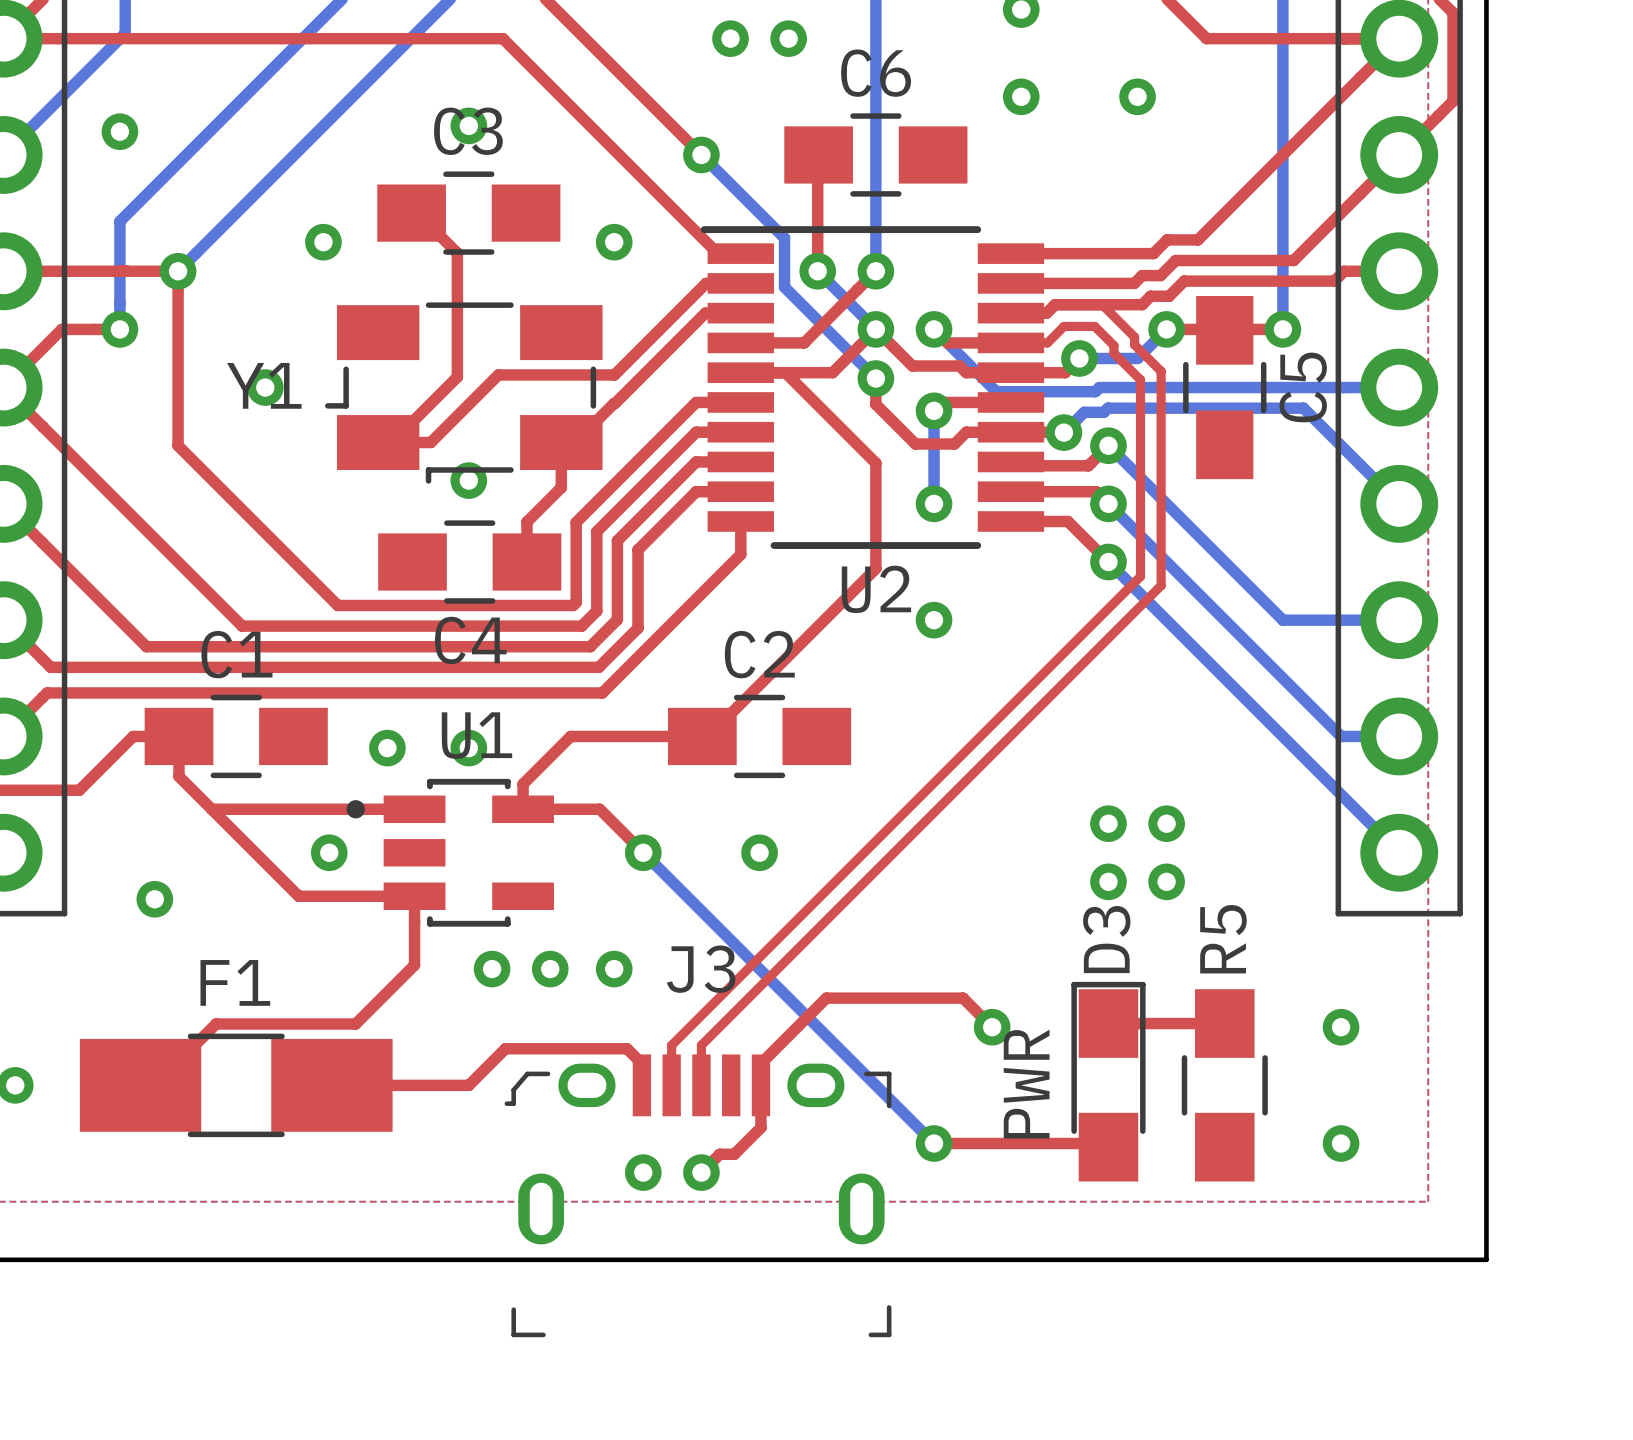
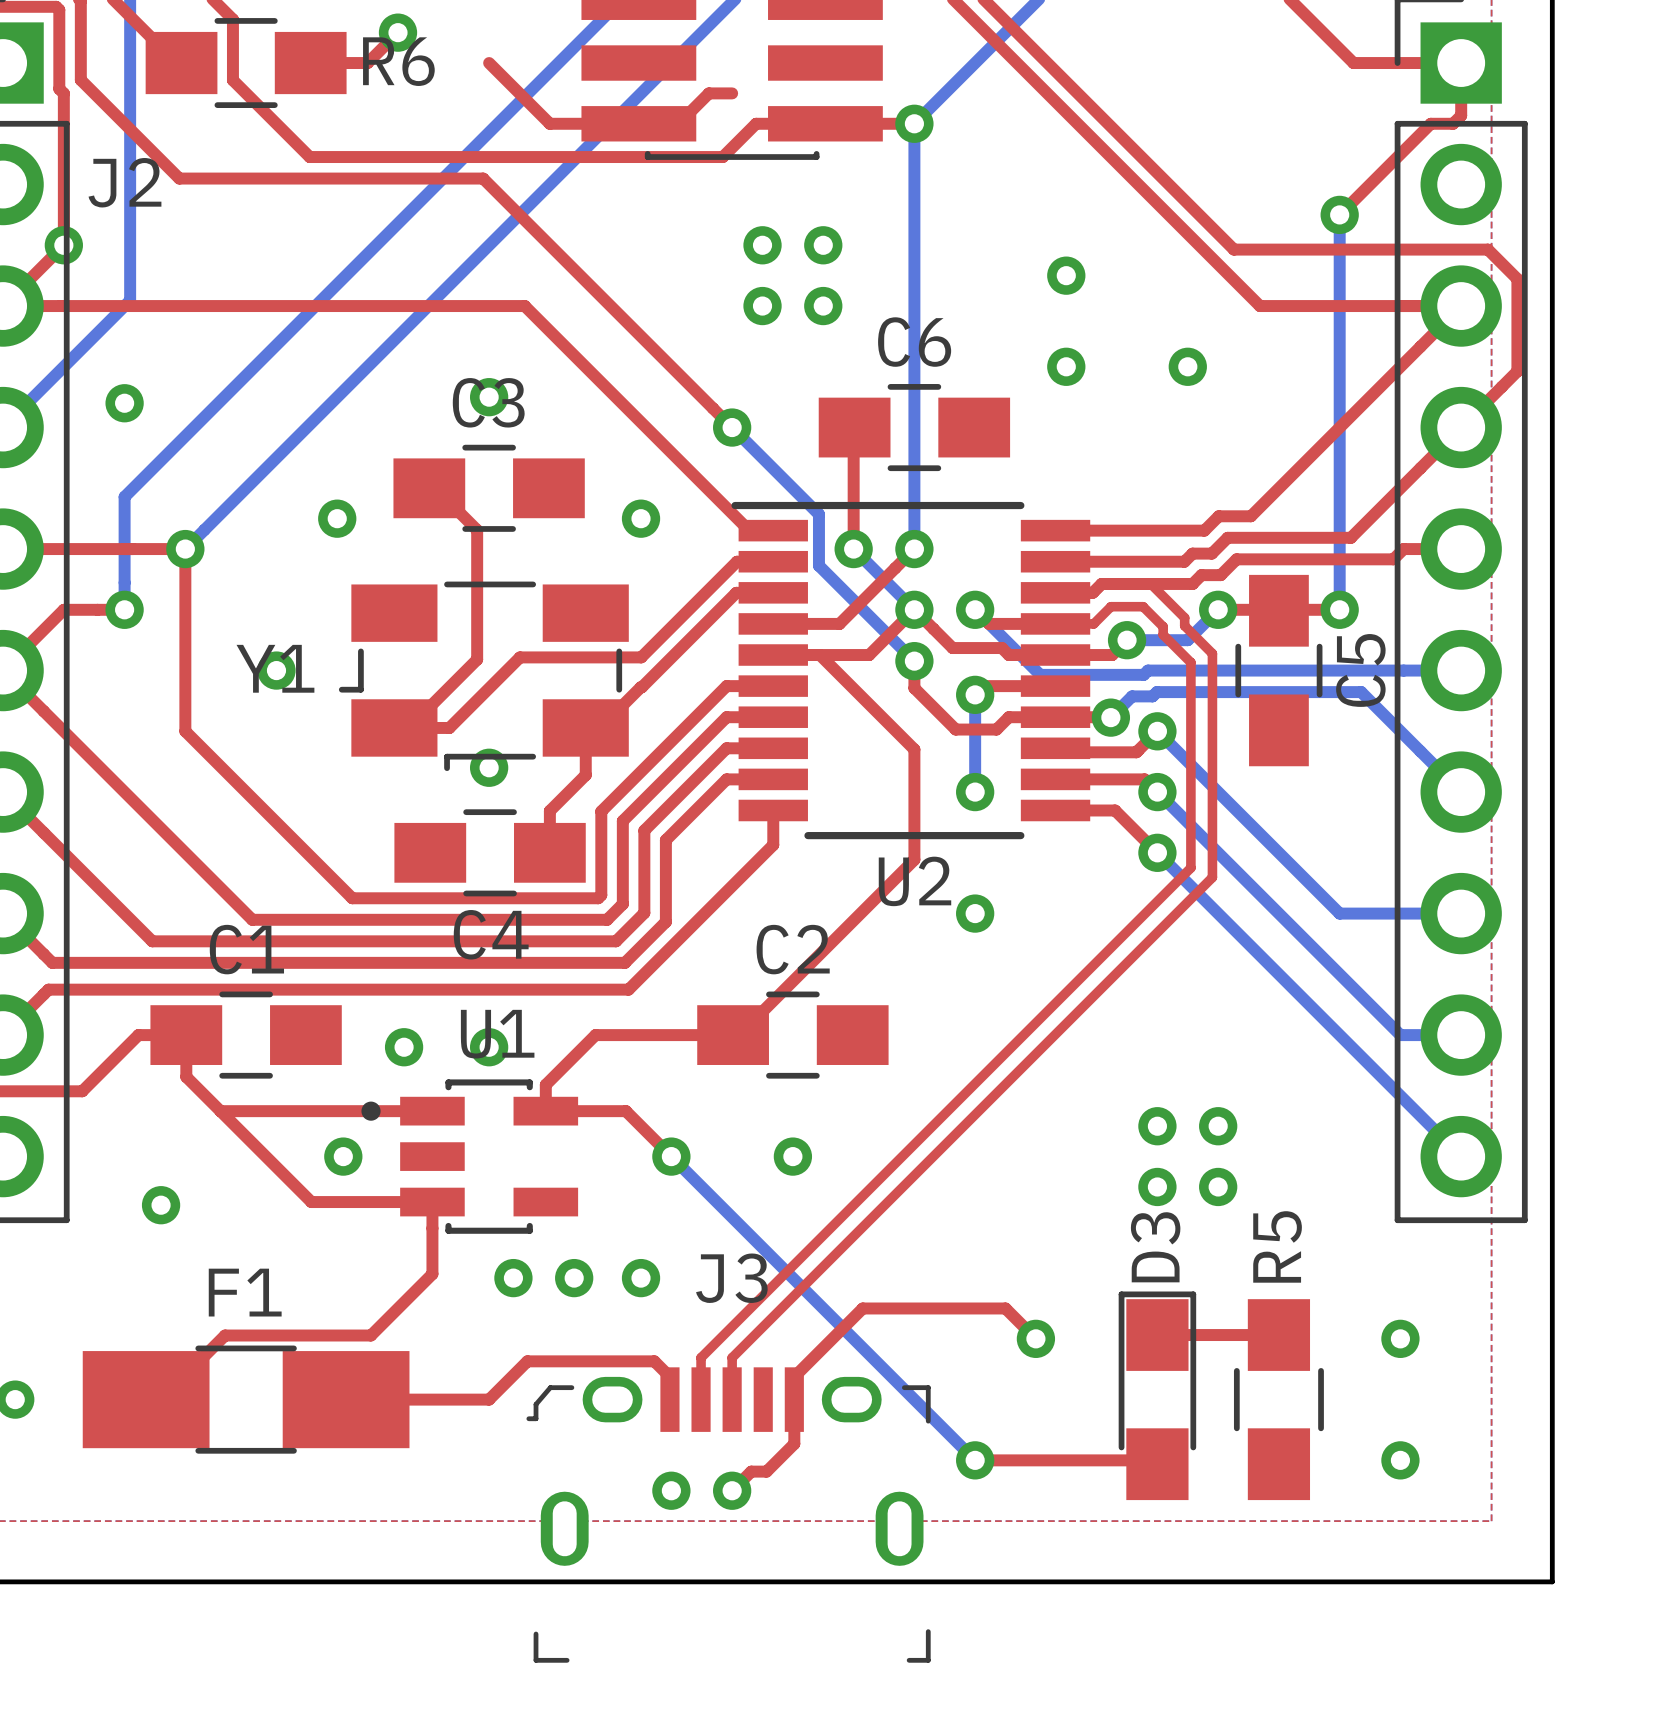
D3 value: PWR (1026, 1084) -> none

